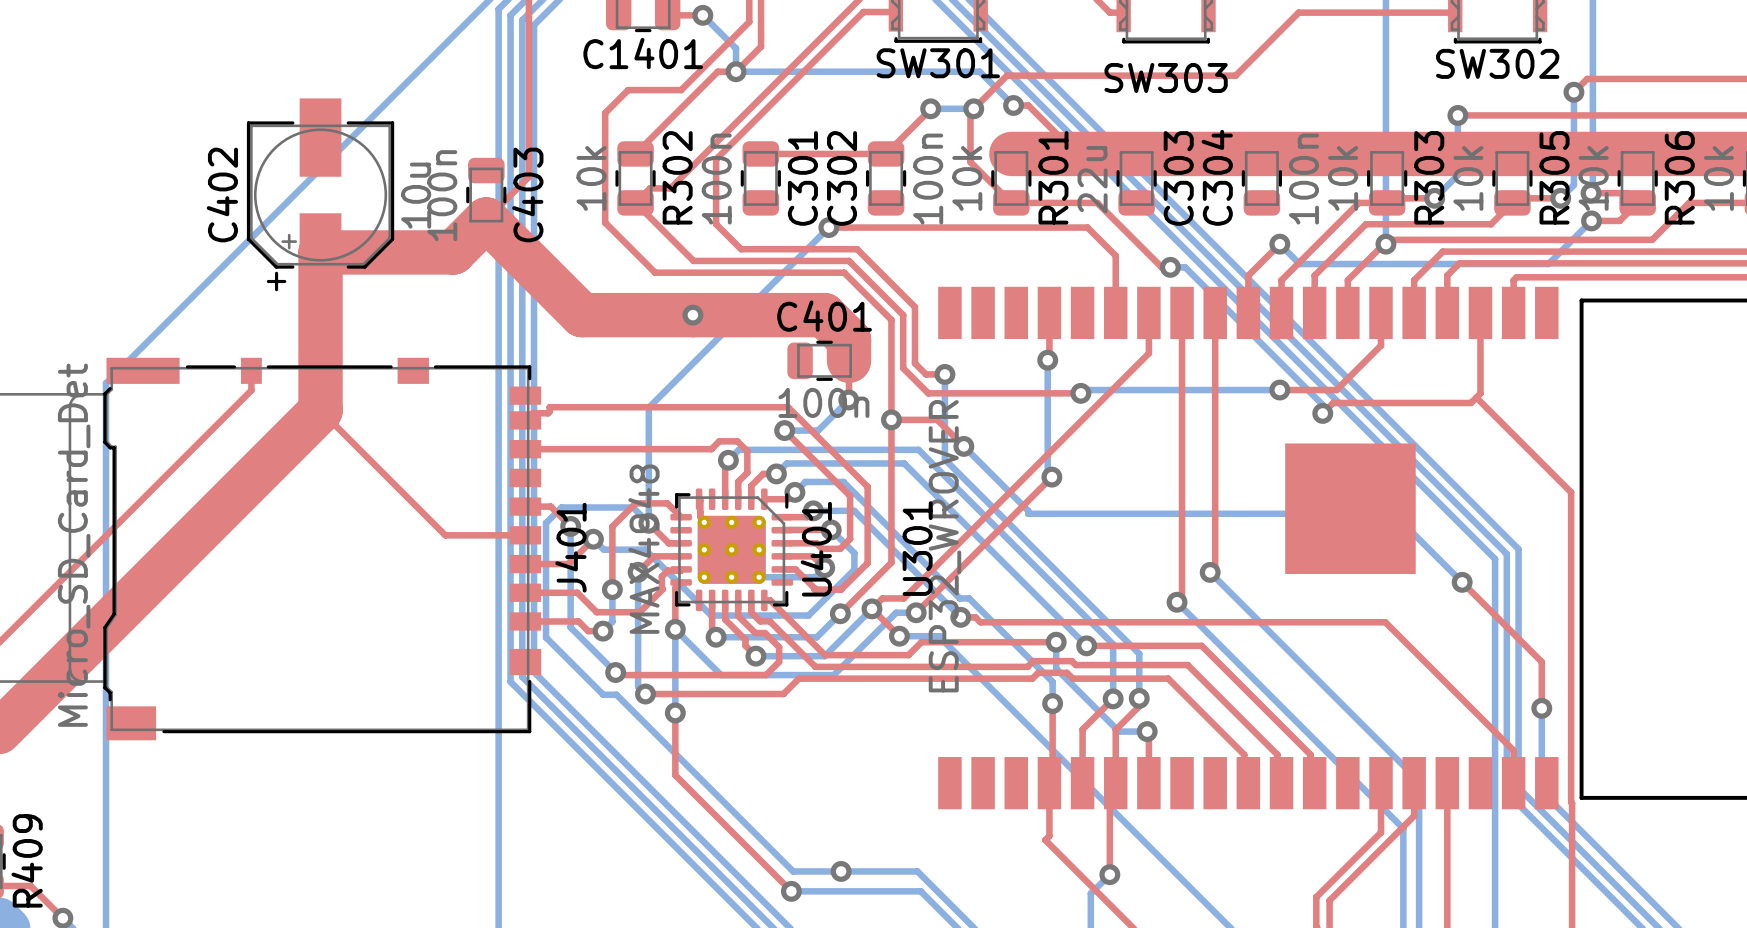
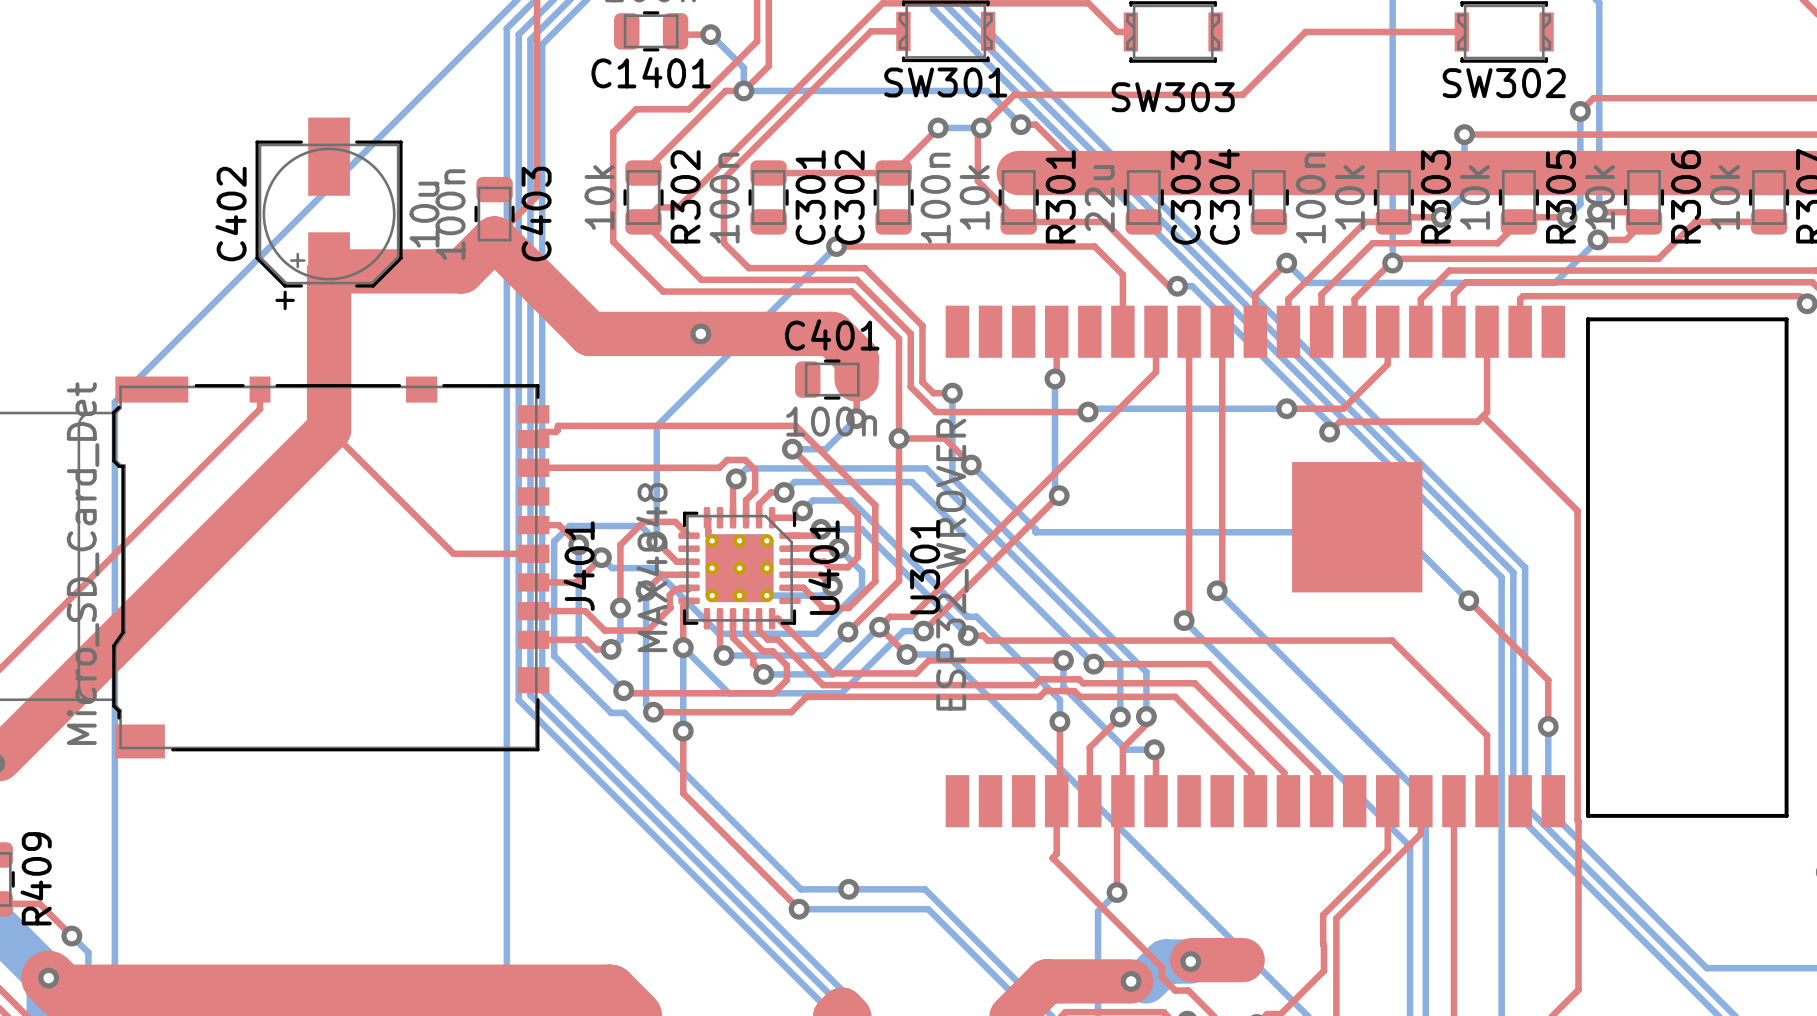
top track: (1480, 717) (1513, 750) (1513, 783) -> (1487, 735) (1487, 801)

